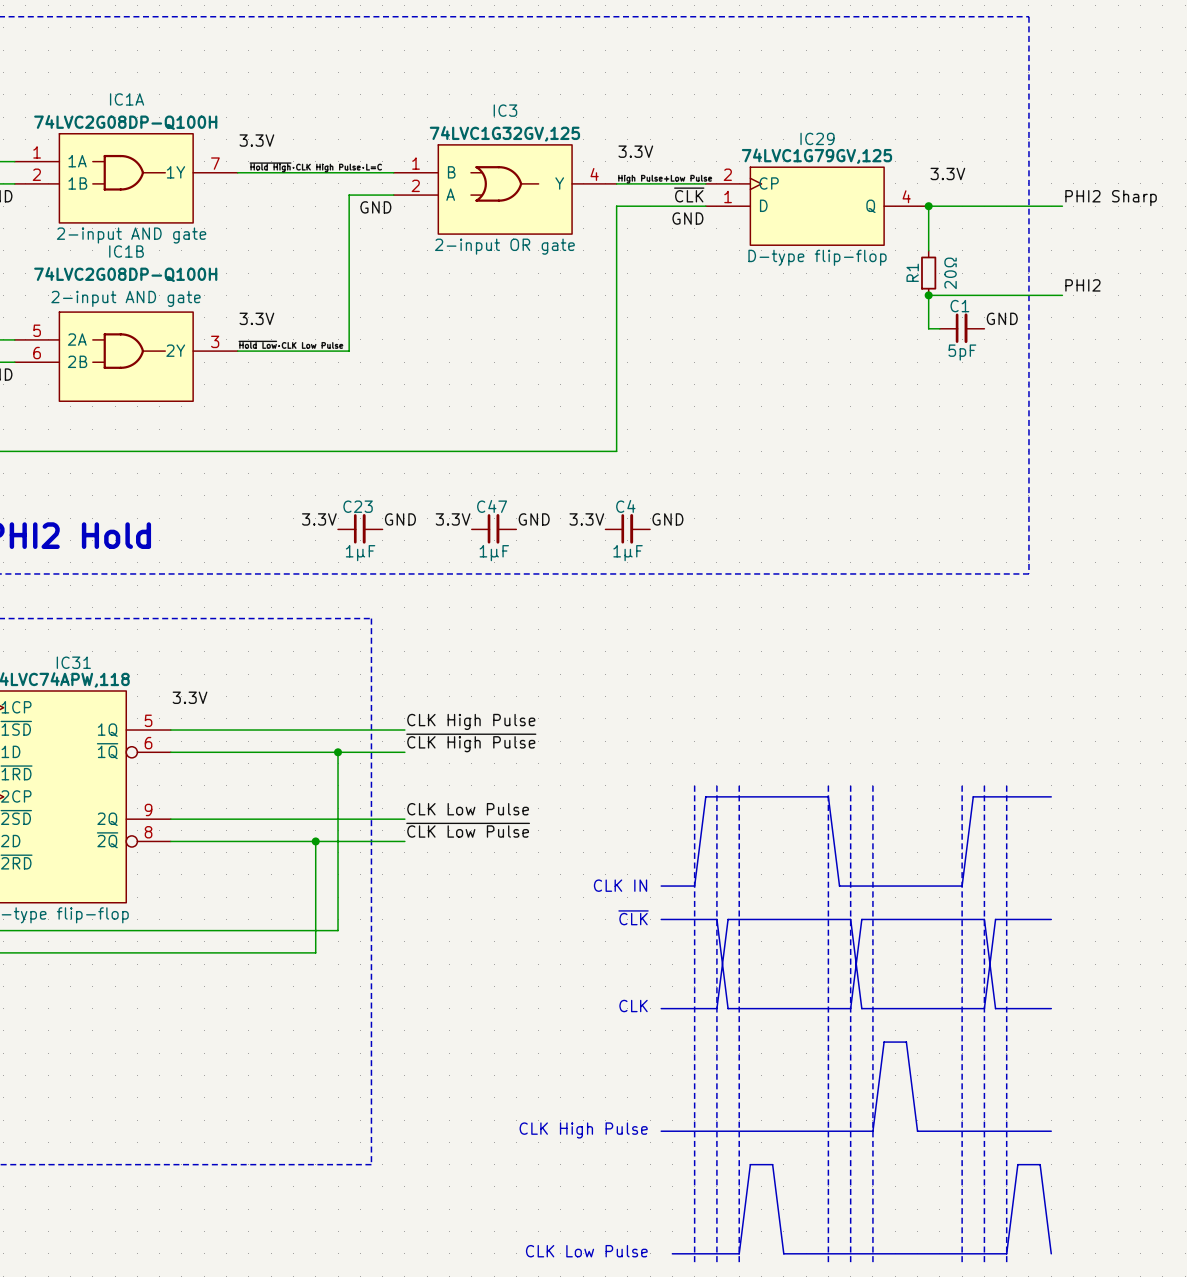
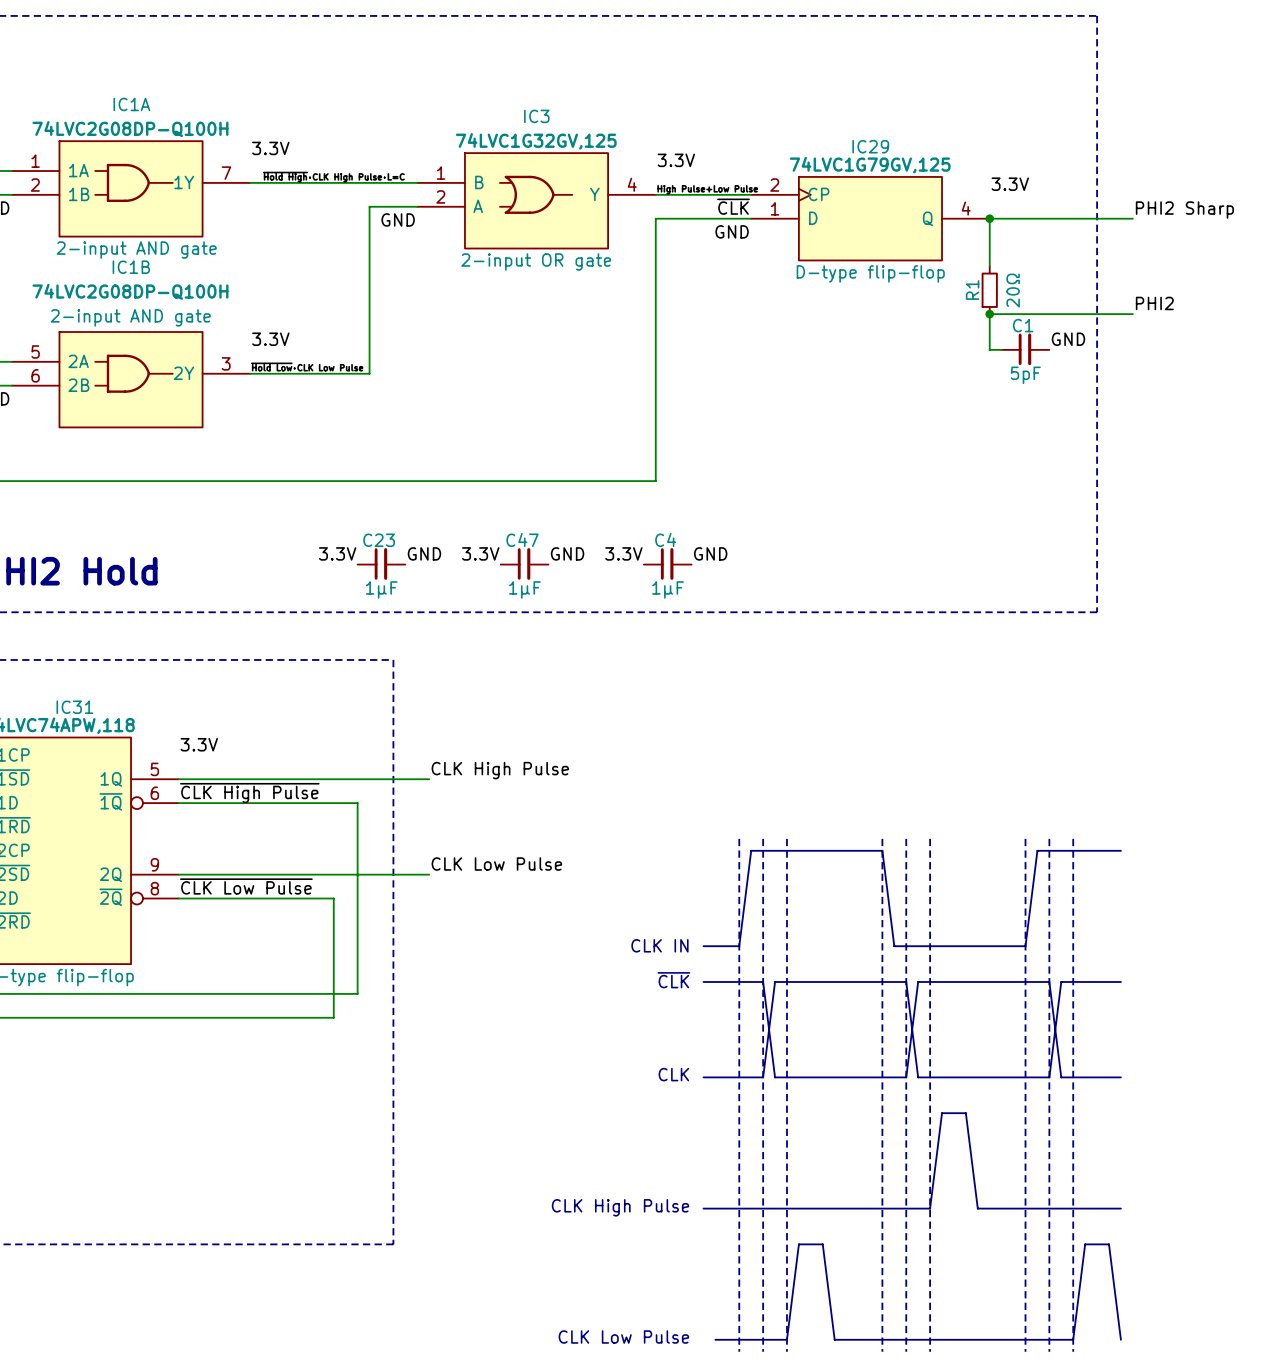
label: none -> ~{CLK High Pulse} (249, 793)
label: ~{CLK High Pulse} (471, 742) -> none
wire: (338, 752) (404, 752) -> none
junction: (338, 752) -> none
label: none -> ~{CLK Low Pulse} (246, 886)
label: ~{CLK Low Pulse} (468, 830) -> none
wire: (315, 841) (404, 841) -> none
junction: (315, 841) -> none

